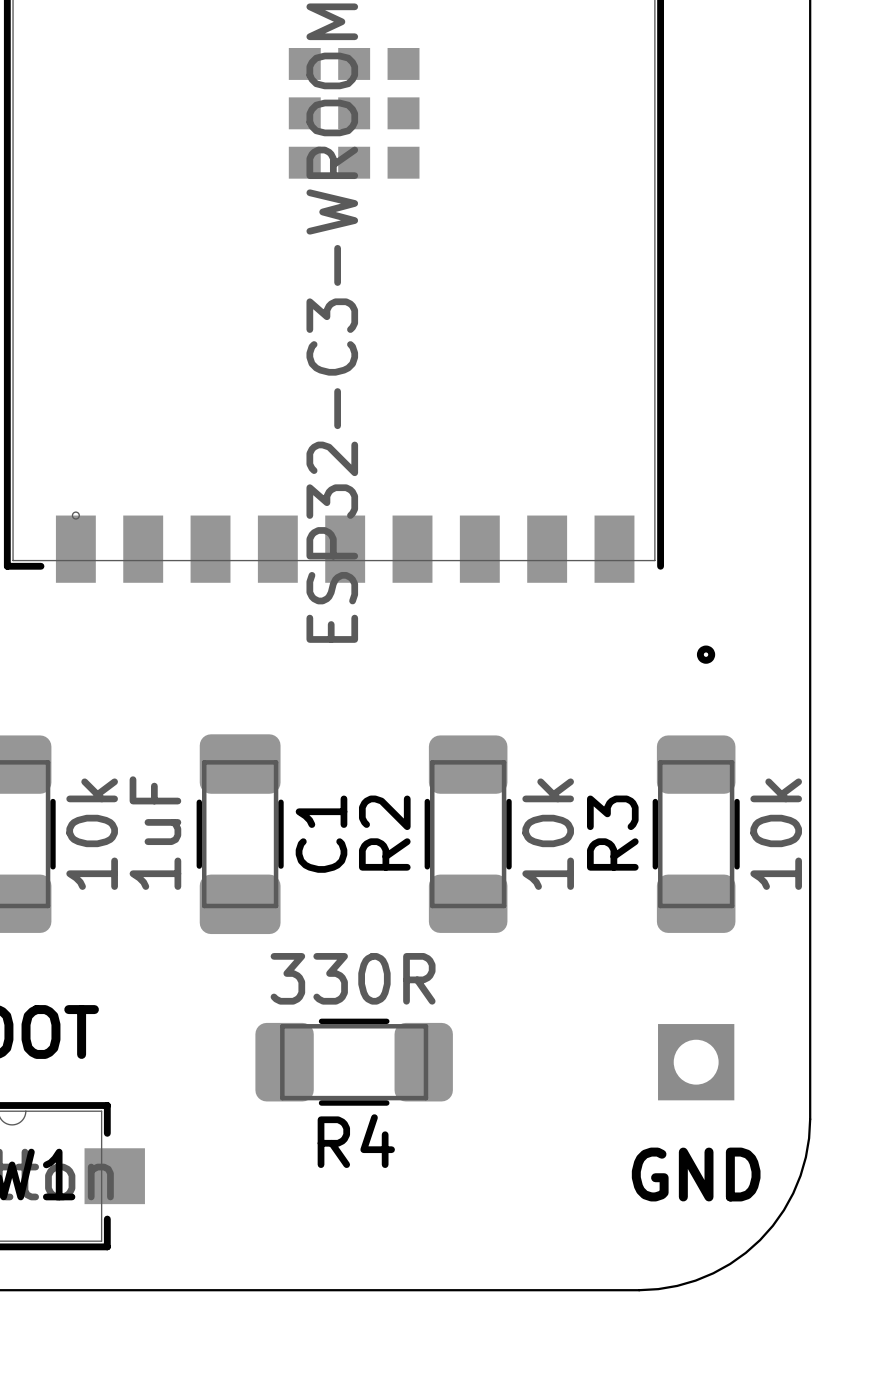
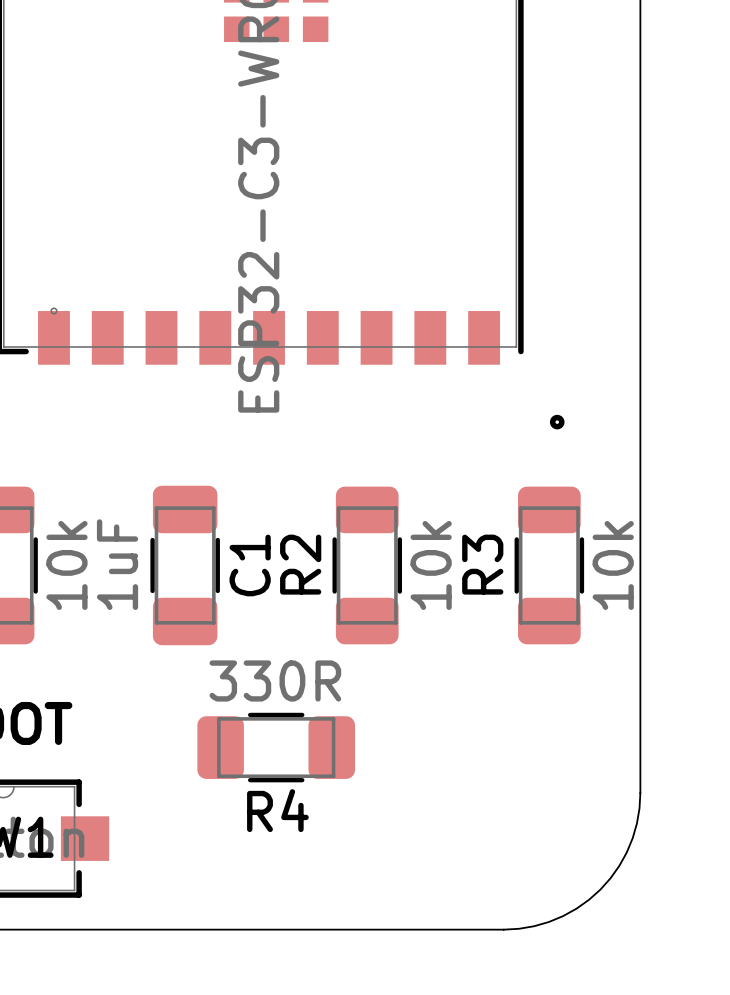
part: (696, 1062) -> none
text: GND (696, 1174) -> none

